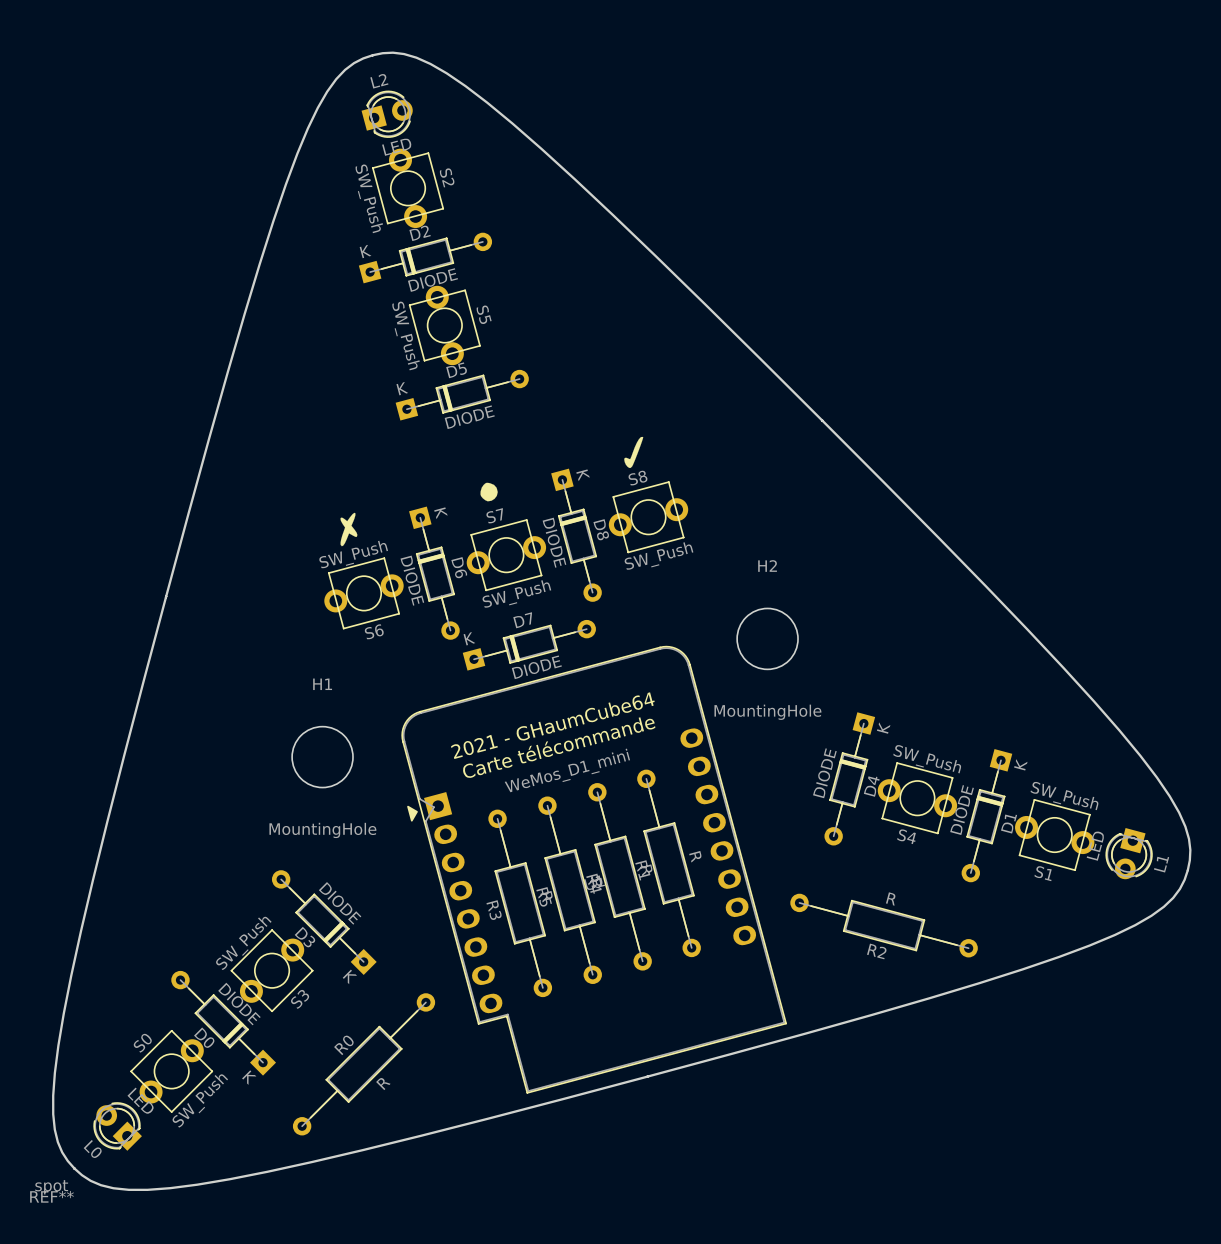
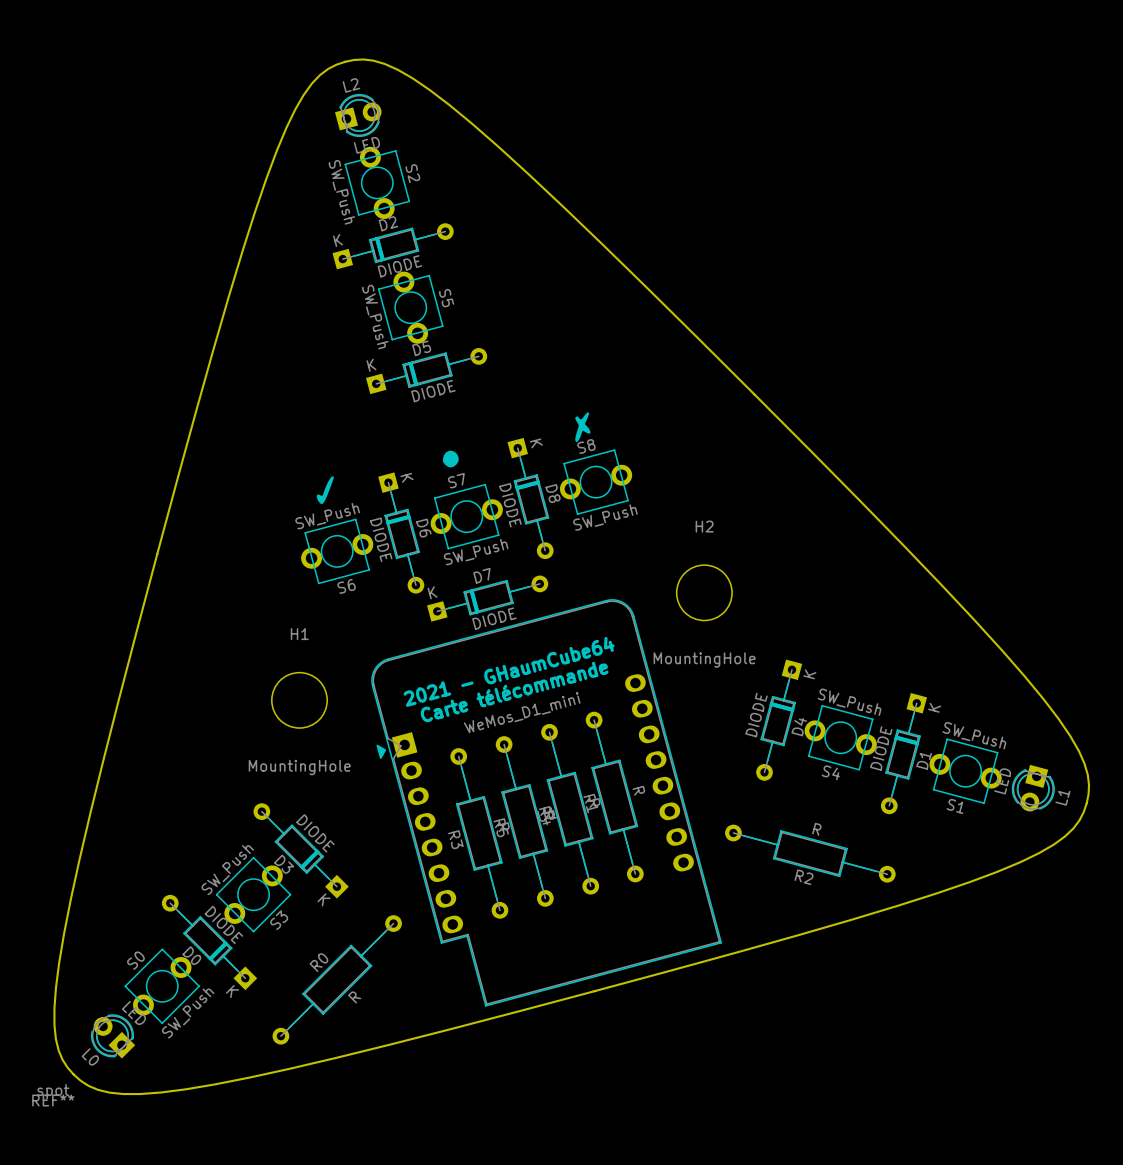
drawing shape: [340, 436, 644, 547] -> [316, 412, 591, 505]

